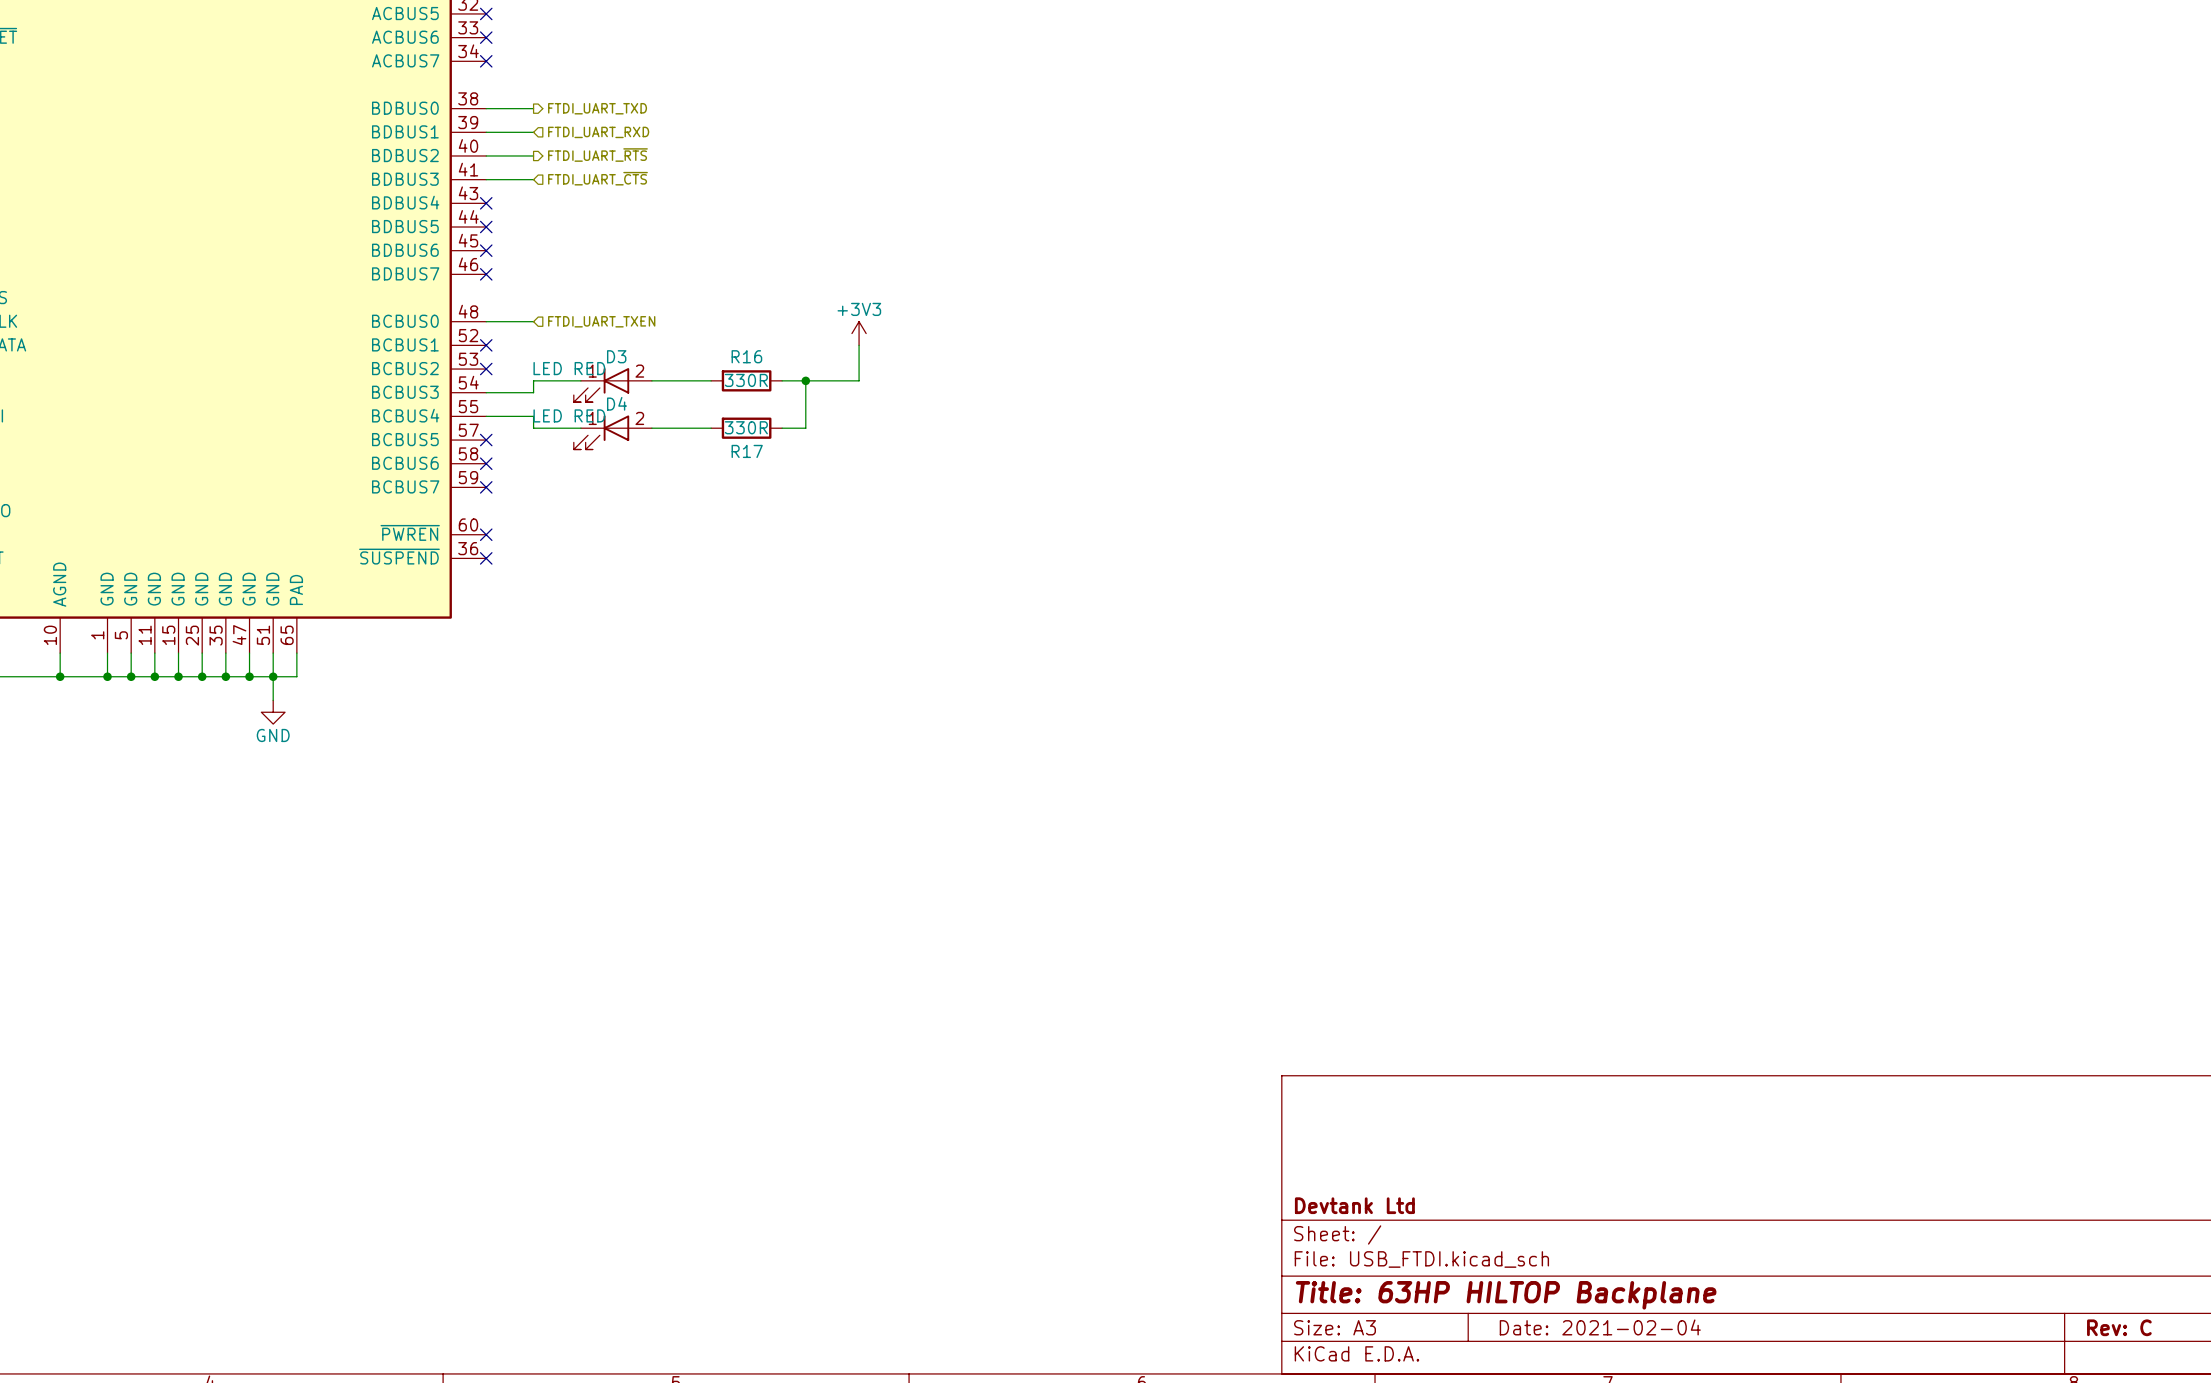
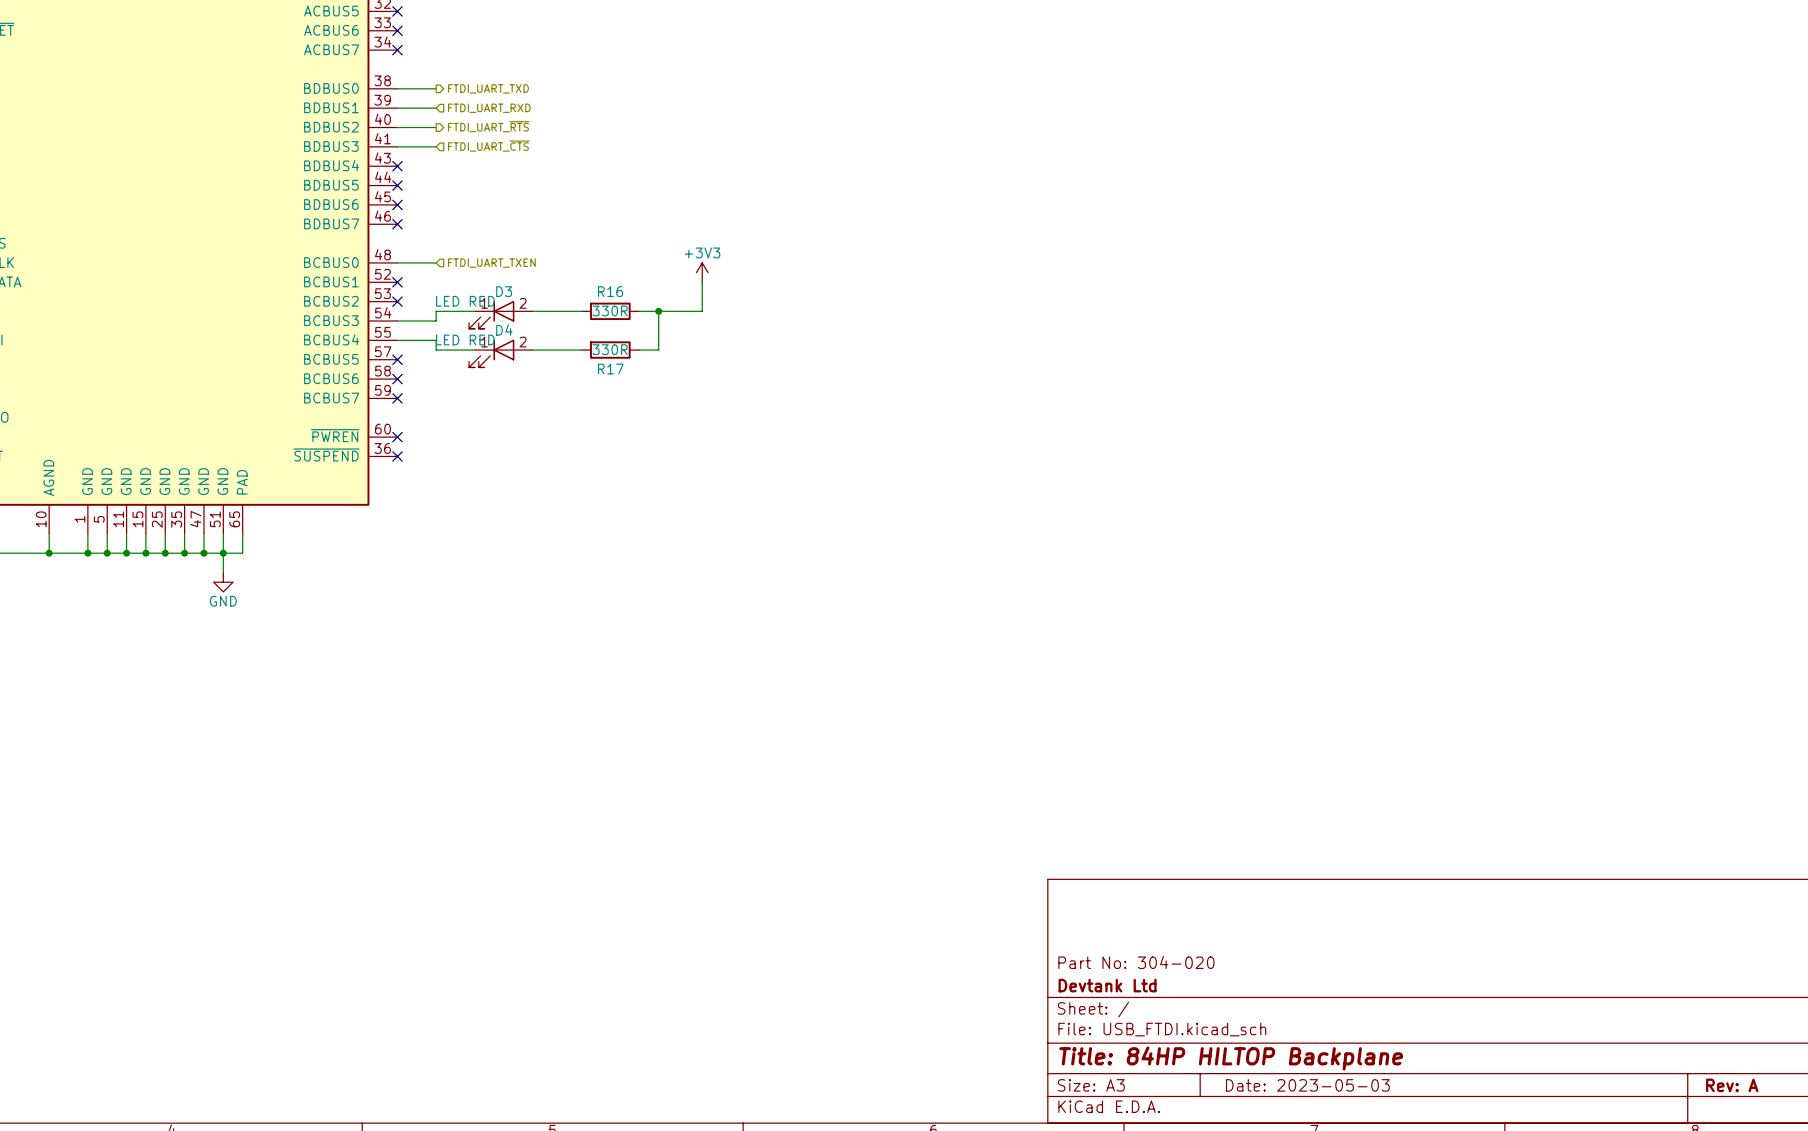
title block: none -> Part No: 304-020 (1136, 962)
title block: Title: 63HP HILTOP Backplane (1506, 1295) -> Title: 84HP HILTOP Backplane (1231, 1058)
title block: Date: 2021-02-04 (1600, 1327) -> Date: 2023-05-03 (1307, 1085)
title block: Rev: C (2119, 1327) -> Rev: A (1732, 1085)

